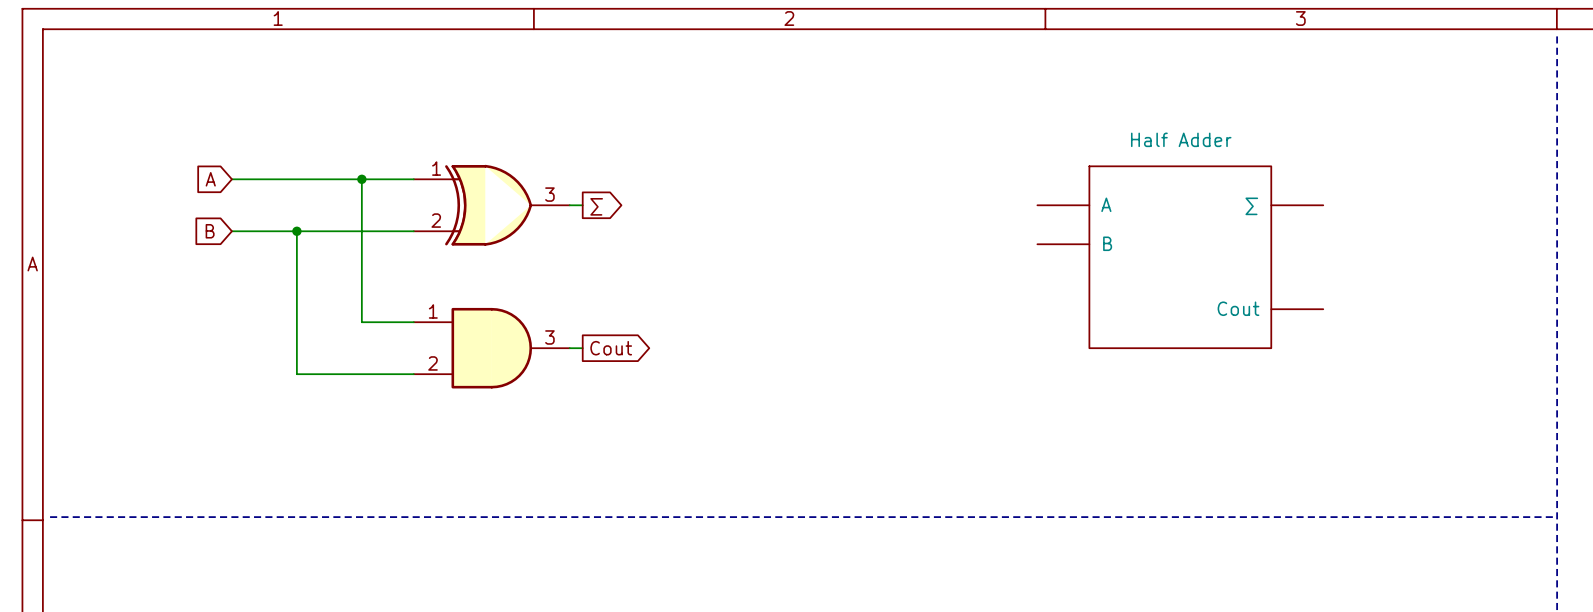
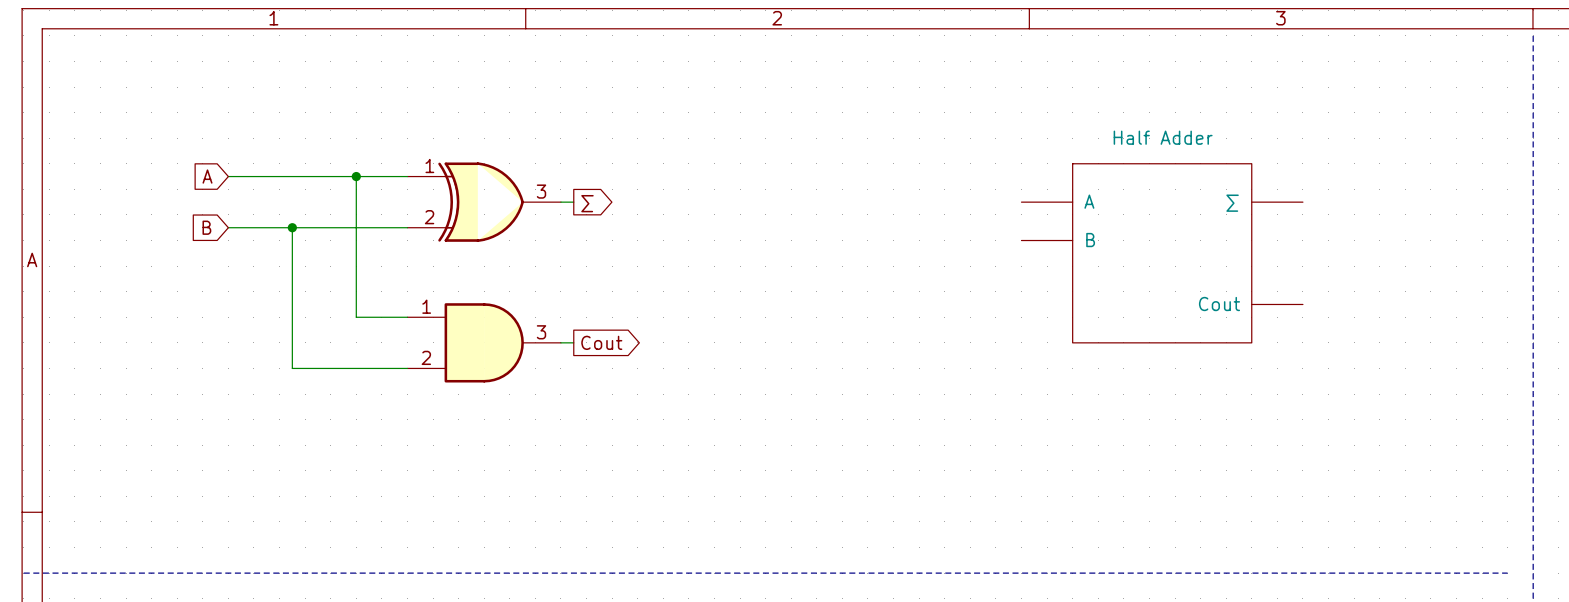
line: (50, 517) (1557, 517) -> (23, 573) (1507, 573)

